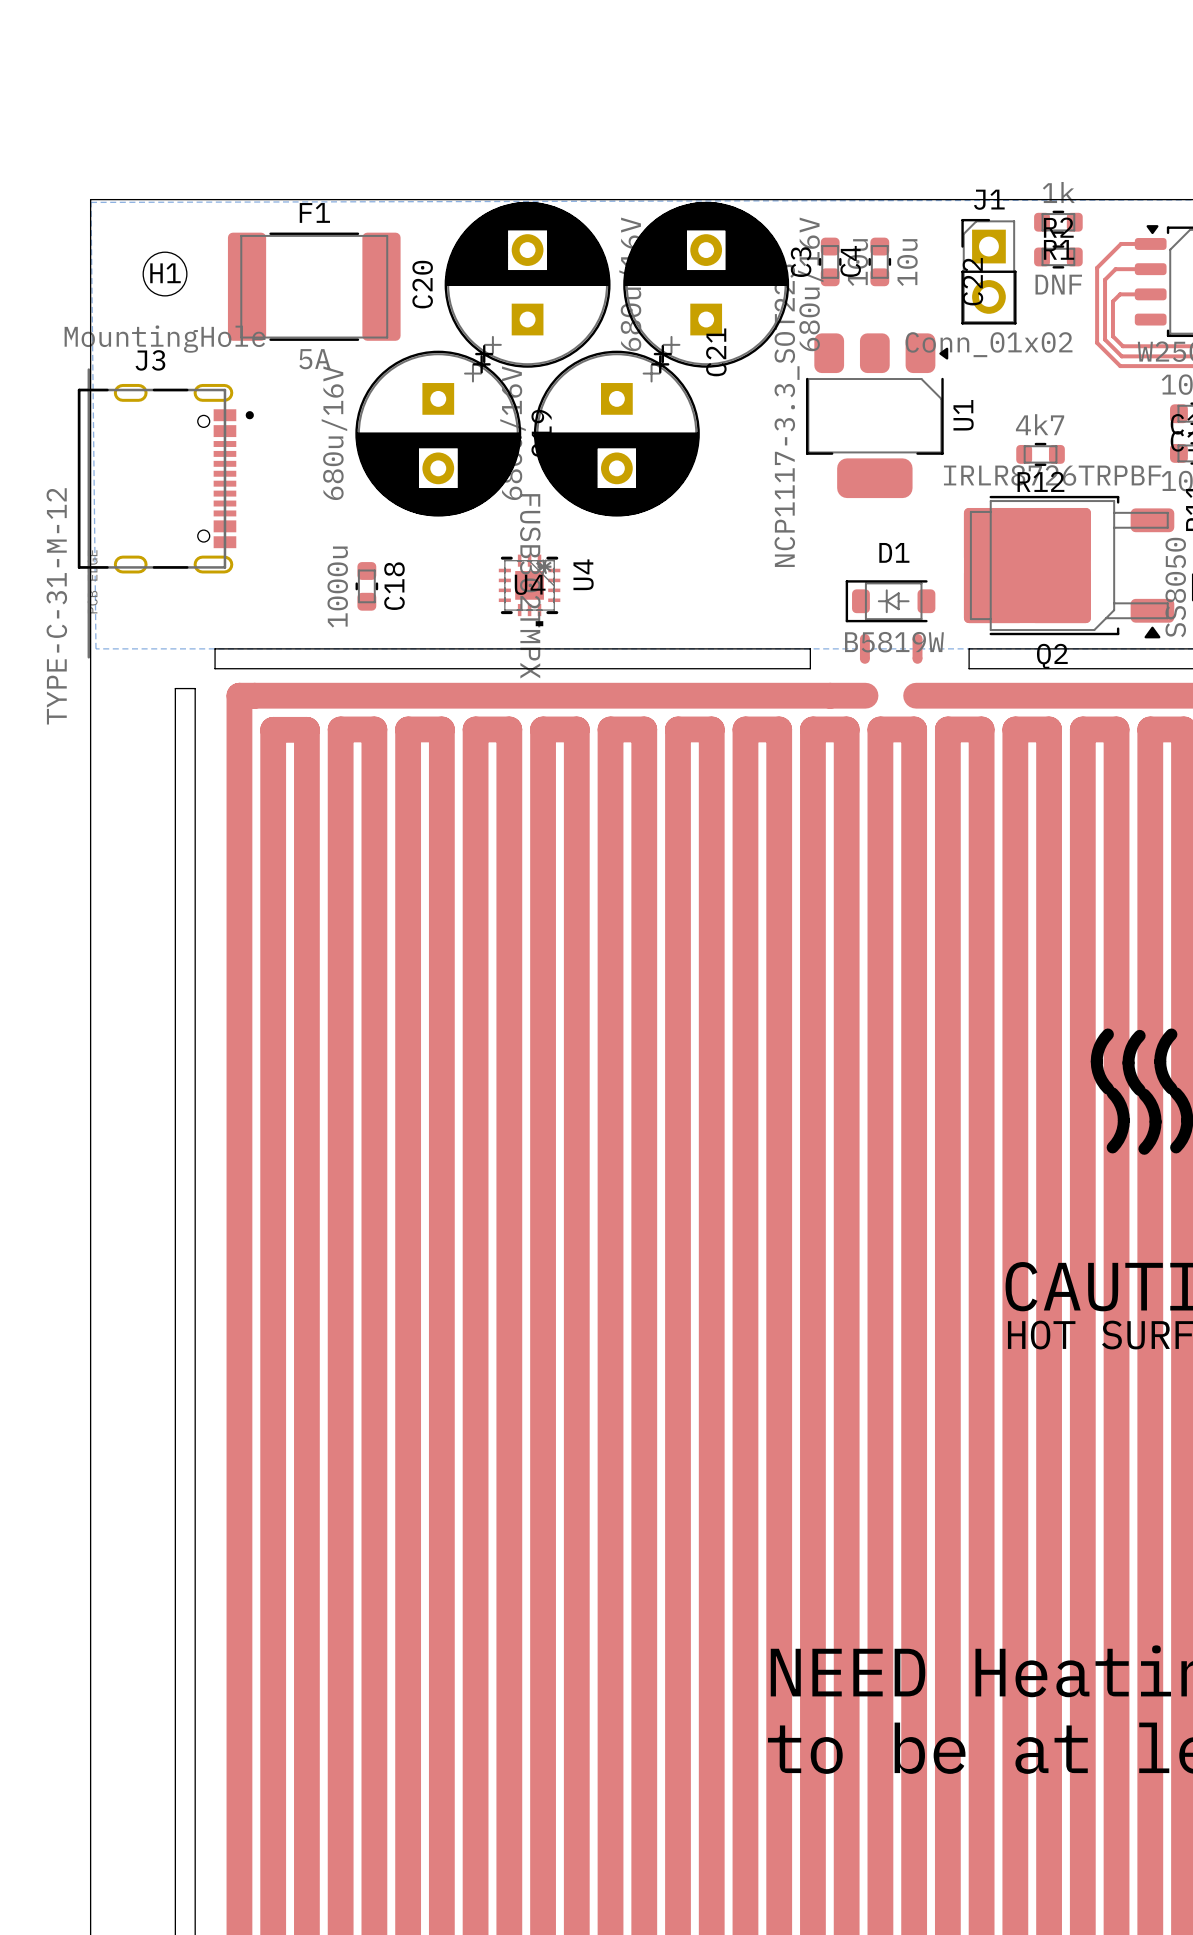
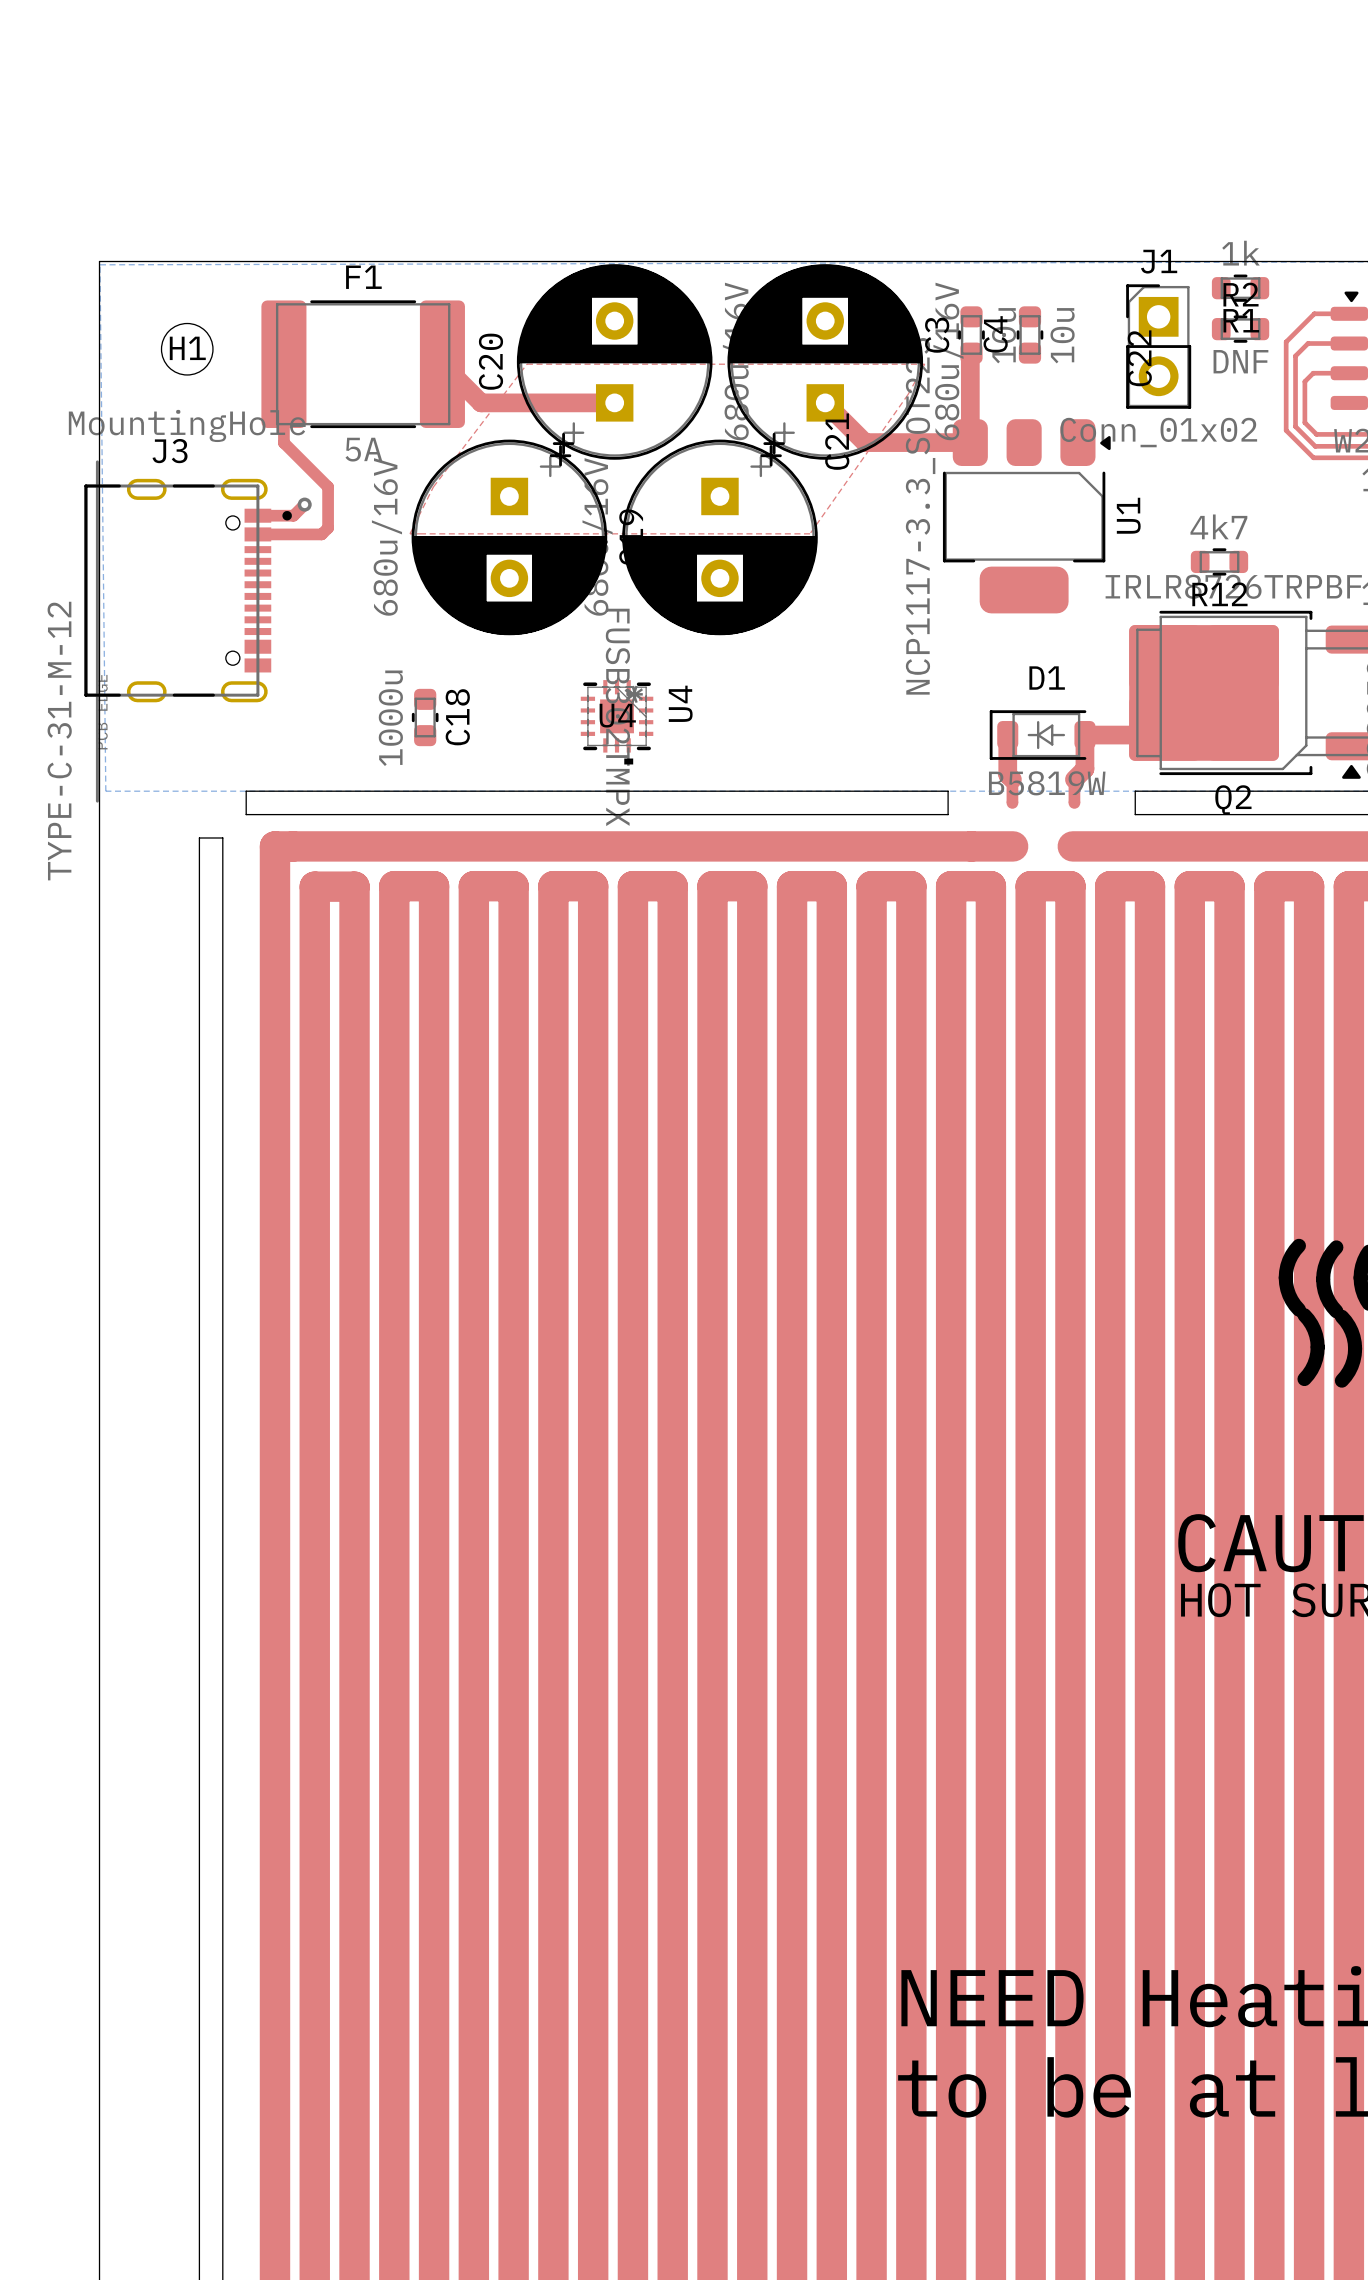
top track: none -> (971, 353) (970, 442) (864, 442) (825, 402)
top track: none -> (283, 364) (283, 442) (328, 487) (328, 527) (321, 534) (257, 534)
top track: none -> (442, 364) (481, 402) (614, 402)
top zone outline: none -> (526, 364) (433, 487) (409, 533) (810, 533) (908, 394) (924, 364) (526, 364)
top track: none -> (304, 504) (293, 515) (257, 515)
via: none -> (304, 504)
top track: none -> (1164, 728) (1158, 735) (1084, 735) (1084, 768) (1074, 779)
top track: none -> (1007, 735) (1007, 774) (1012, 779)

